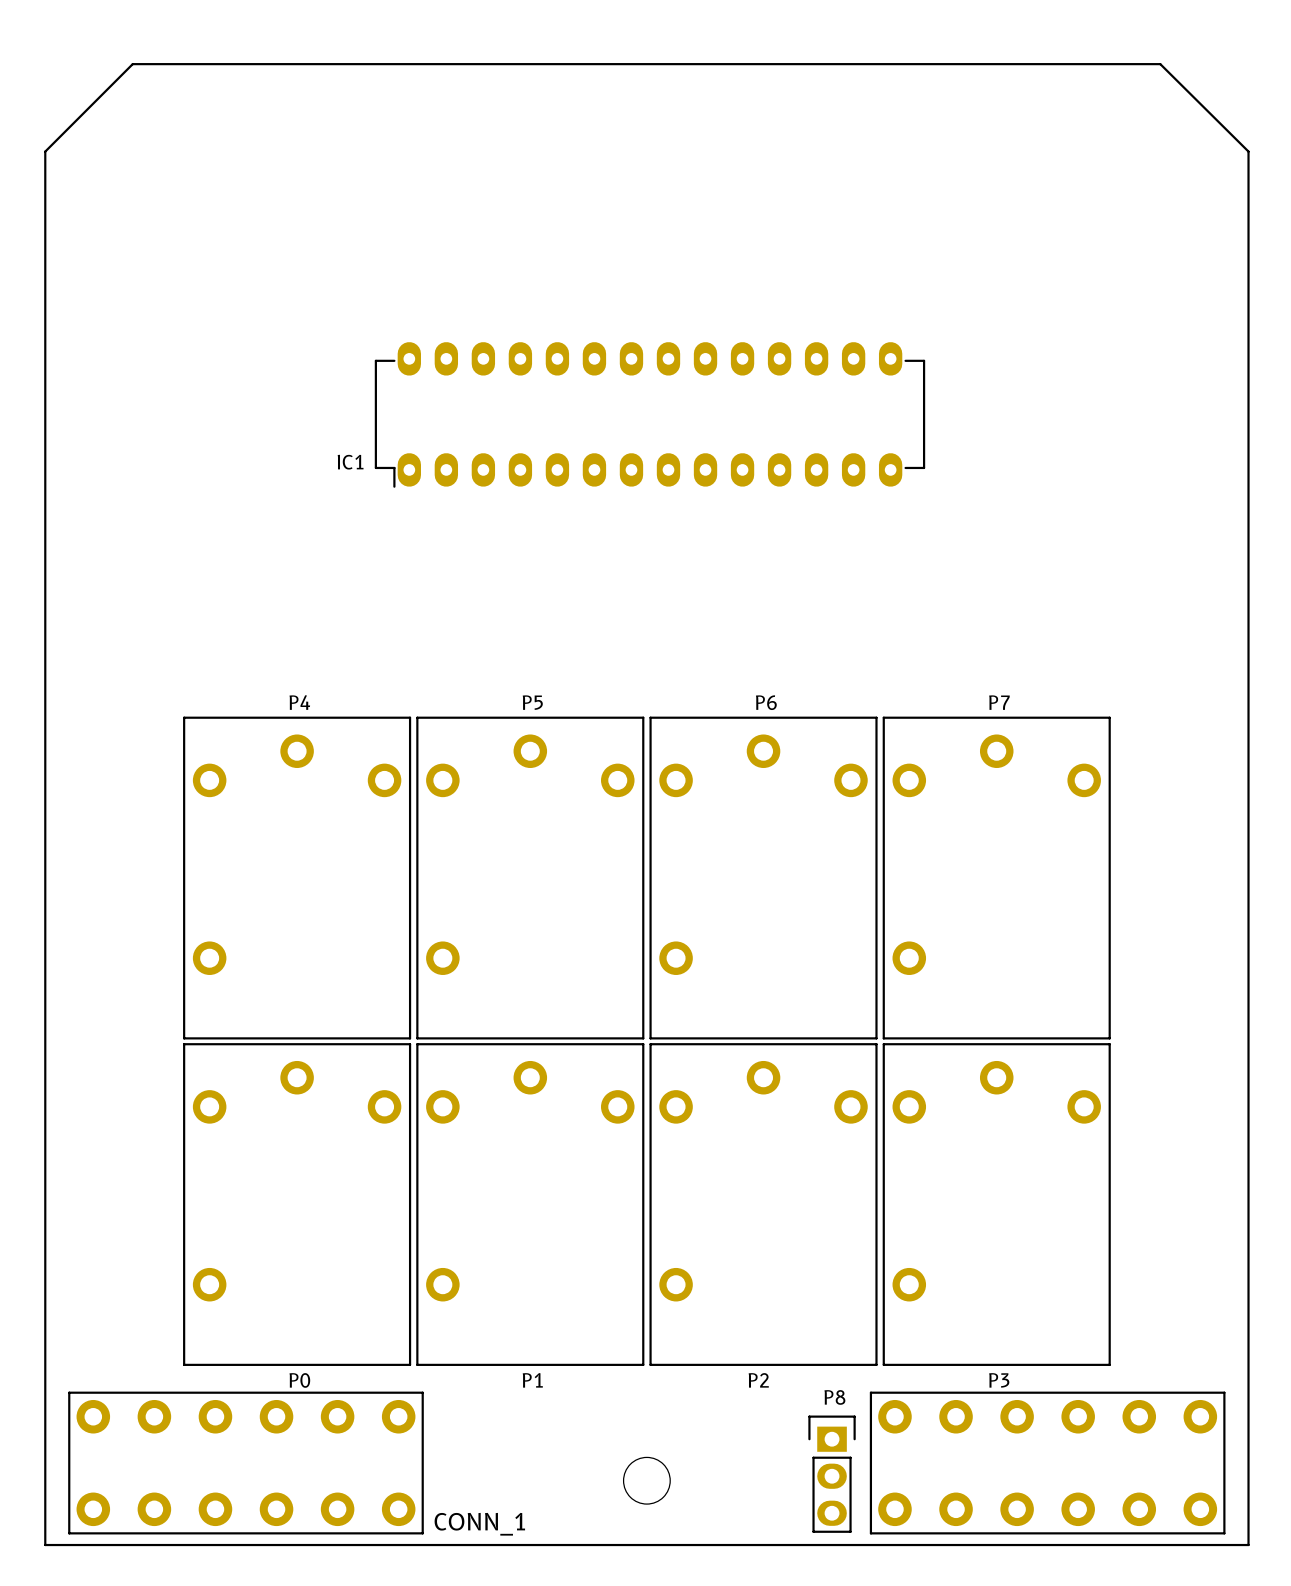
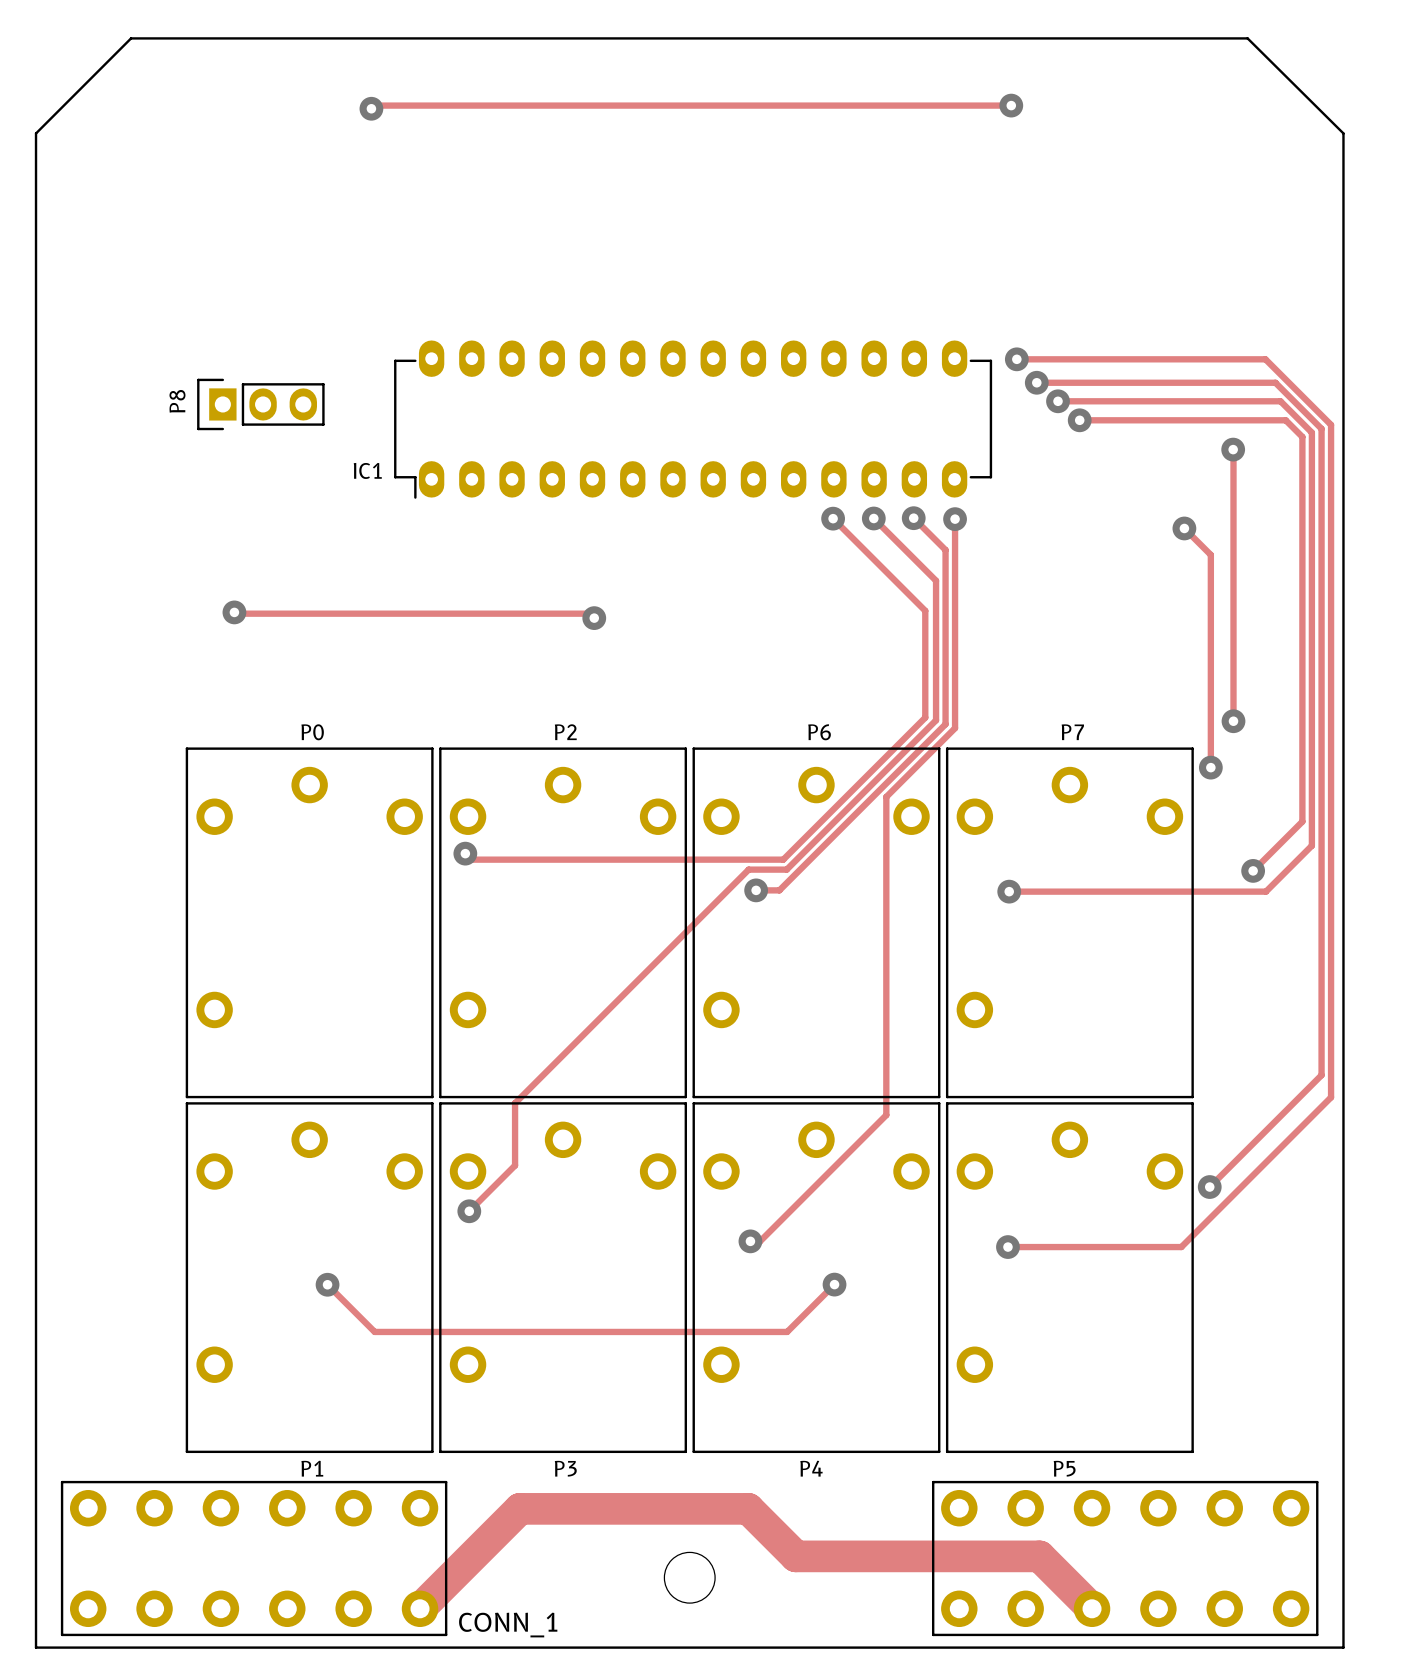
track: none -> (1011, 105) (374, 105) (371, 108)
via: none -> (1011, 105)
via: none -> (371, 108)
track: none -> (1016, 359) (1265, 359) (1331, 424) (1331, 1097) (1181, 1247) (1007, 1247)
via: none -> (1016, 359)
track: none -> (1036, 382) (1275, 382) (1321, 428) (1321, 1075) (1209, 1187)
via: none -> (1036, 382)
track: none -> (1058, 401) (1280, 401) (1311, 432) (1311, 845) (1265, 891) (1009, 891)
via: none -> (1058, 401)
track: none -> (1079, 420) (1285, 420) (1302, 436) (1302, 821) (1253, 870)
via: none -> (1079, 420)
track: none -> (1233, 449) (1233, 721)
via: none -> (1233, 449)
track: none -> (873, 518) (936, 580) (936, 720) (786, 869) (748, 869) (515, 1103) (515, 1165) (469, 1211)
via: none -> (873, 518)
track: none -> (913, 518) (945, 550) (945, 724) (779, 890) (756, 890)
via: none -> (913, 518)
track: none -> (833, 518) (925, 610) (925, 717) (783, 859) (471, 859) (465, 853)
via: none -> (833, 518)
track: none -> (955, 519) (955, 728) (886, 796) (886, 1115) (760, 1241) (750, 1241)
via: none -> (955, 519)
track: none -> (1184, 528) (1210, 554) (1210, 767)
via: none -> (1184, 528)
via: none -> (234, 612)
track: none -> (234, 613) (589, 613) (594, 618)
via: none -> (594, 618)
via: none -> (1233, 721)
P4 name: P4 (299, 702) -> P0 (312, 732)
P5 name: P5 (532, 702) -> P2 (565, 732)
via: none -> (1210, 767)
via: none -> (465, 853)
via: none -> (1253, 870)
via: none -> (756, 890)
via: none -> (1009, 891)
via: none -> (1209, 1187)
via: none -> (469, 1211)
via: none -> (750, 1241)
via: none -> (1007, 1247)
track: none -> (834, 1284) (787, 1331) (374, 1331) (327, 1284)
via: none -> (834, 1284)
via: none -> (327, 1284)
P0 name: P0 (299, 1380) -> P1 (312, 1468)
P1 name: P1 (532, 1380) -> P3 (565, 1468)
P2 name: P2 (758, 1380) -> P4 (811, 1468)
P3 name: P3 (999, 1380) -> P5 (1064, 1468)
P8 rotation: 0° (832, 1474) -> 90° counterclockwise (260, 404)
P8 position: (832, 1474) -> (260, 404)
track: none -> (420, 1608) (519, 1508) (748, 1508) (795, 1556) (1039, 1556) (1092, 1608)

